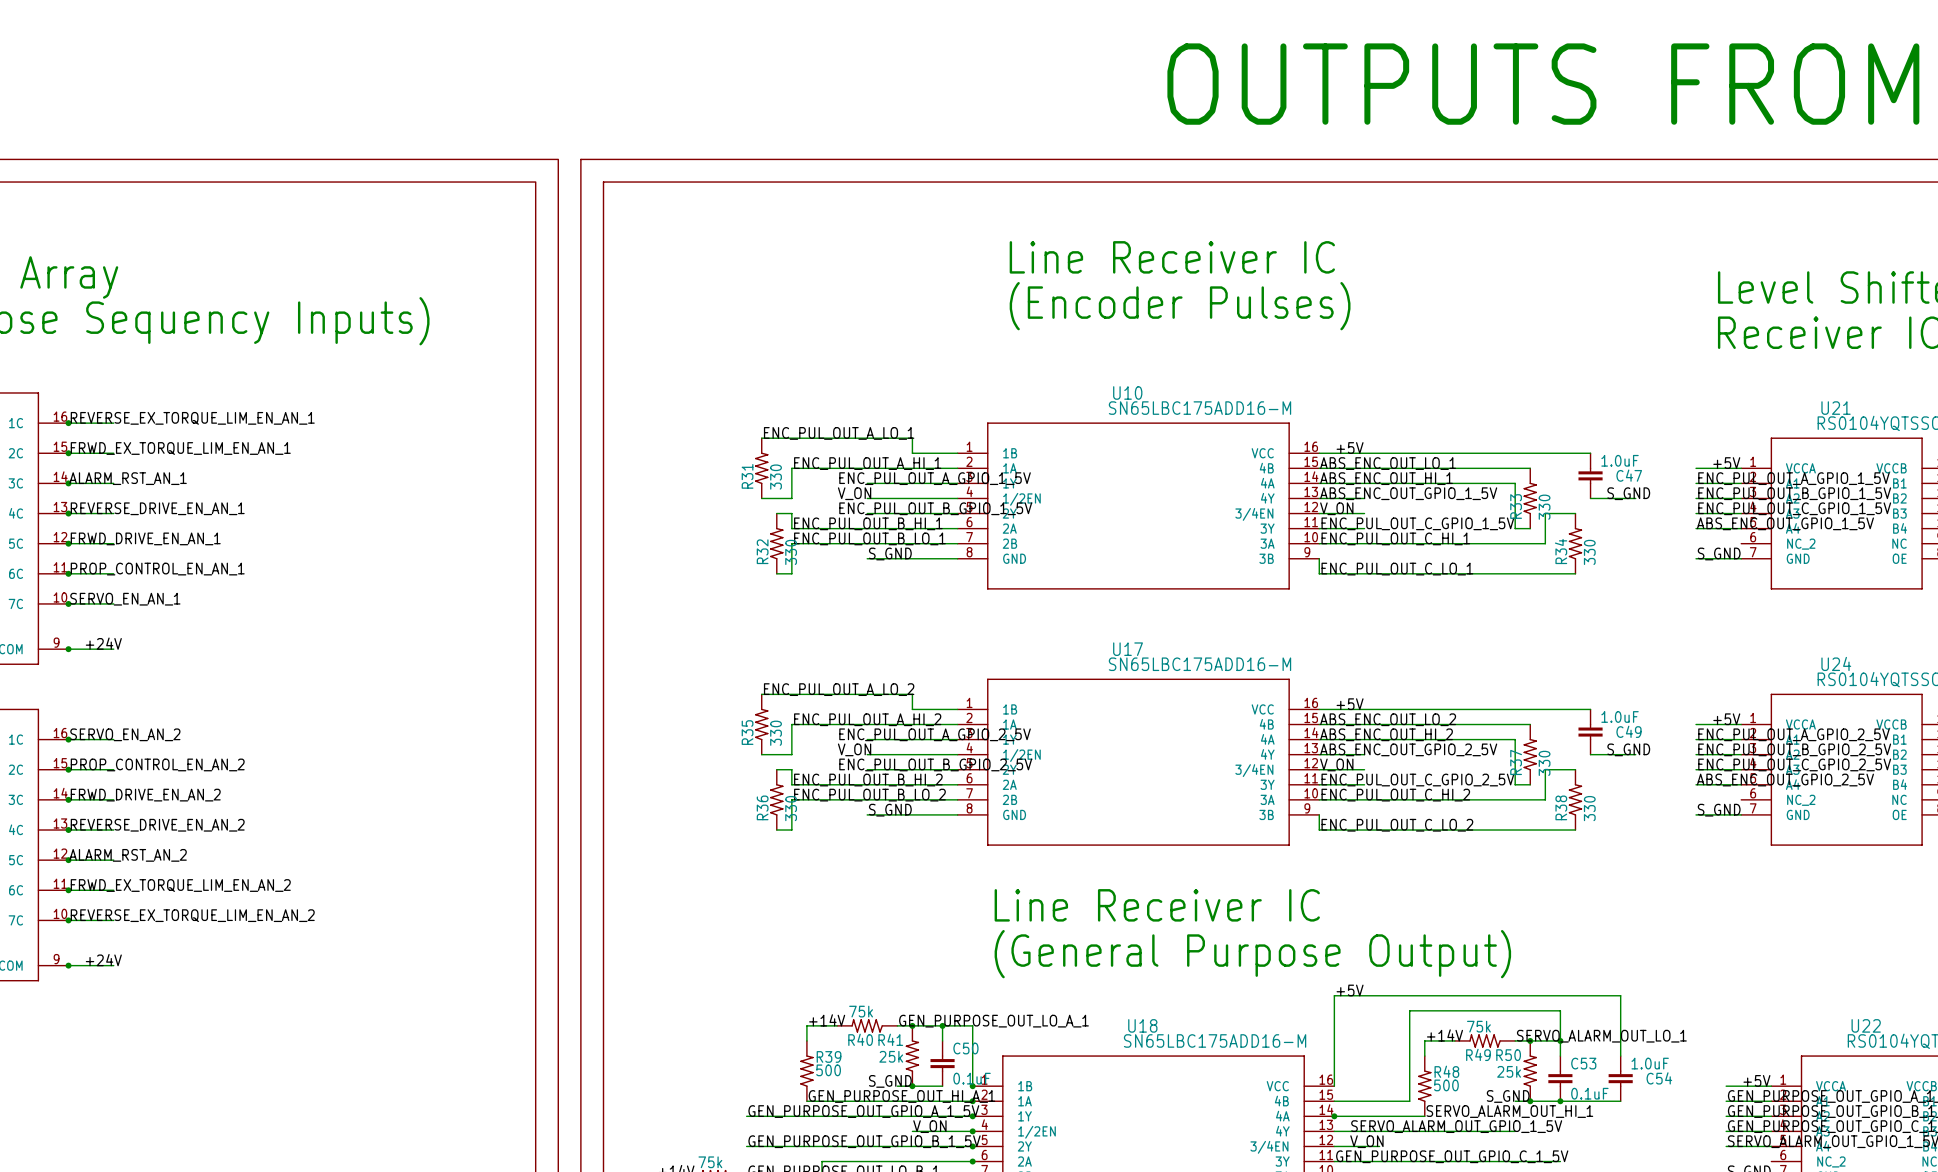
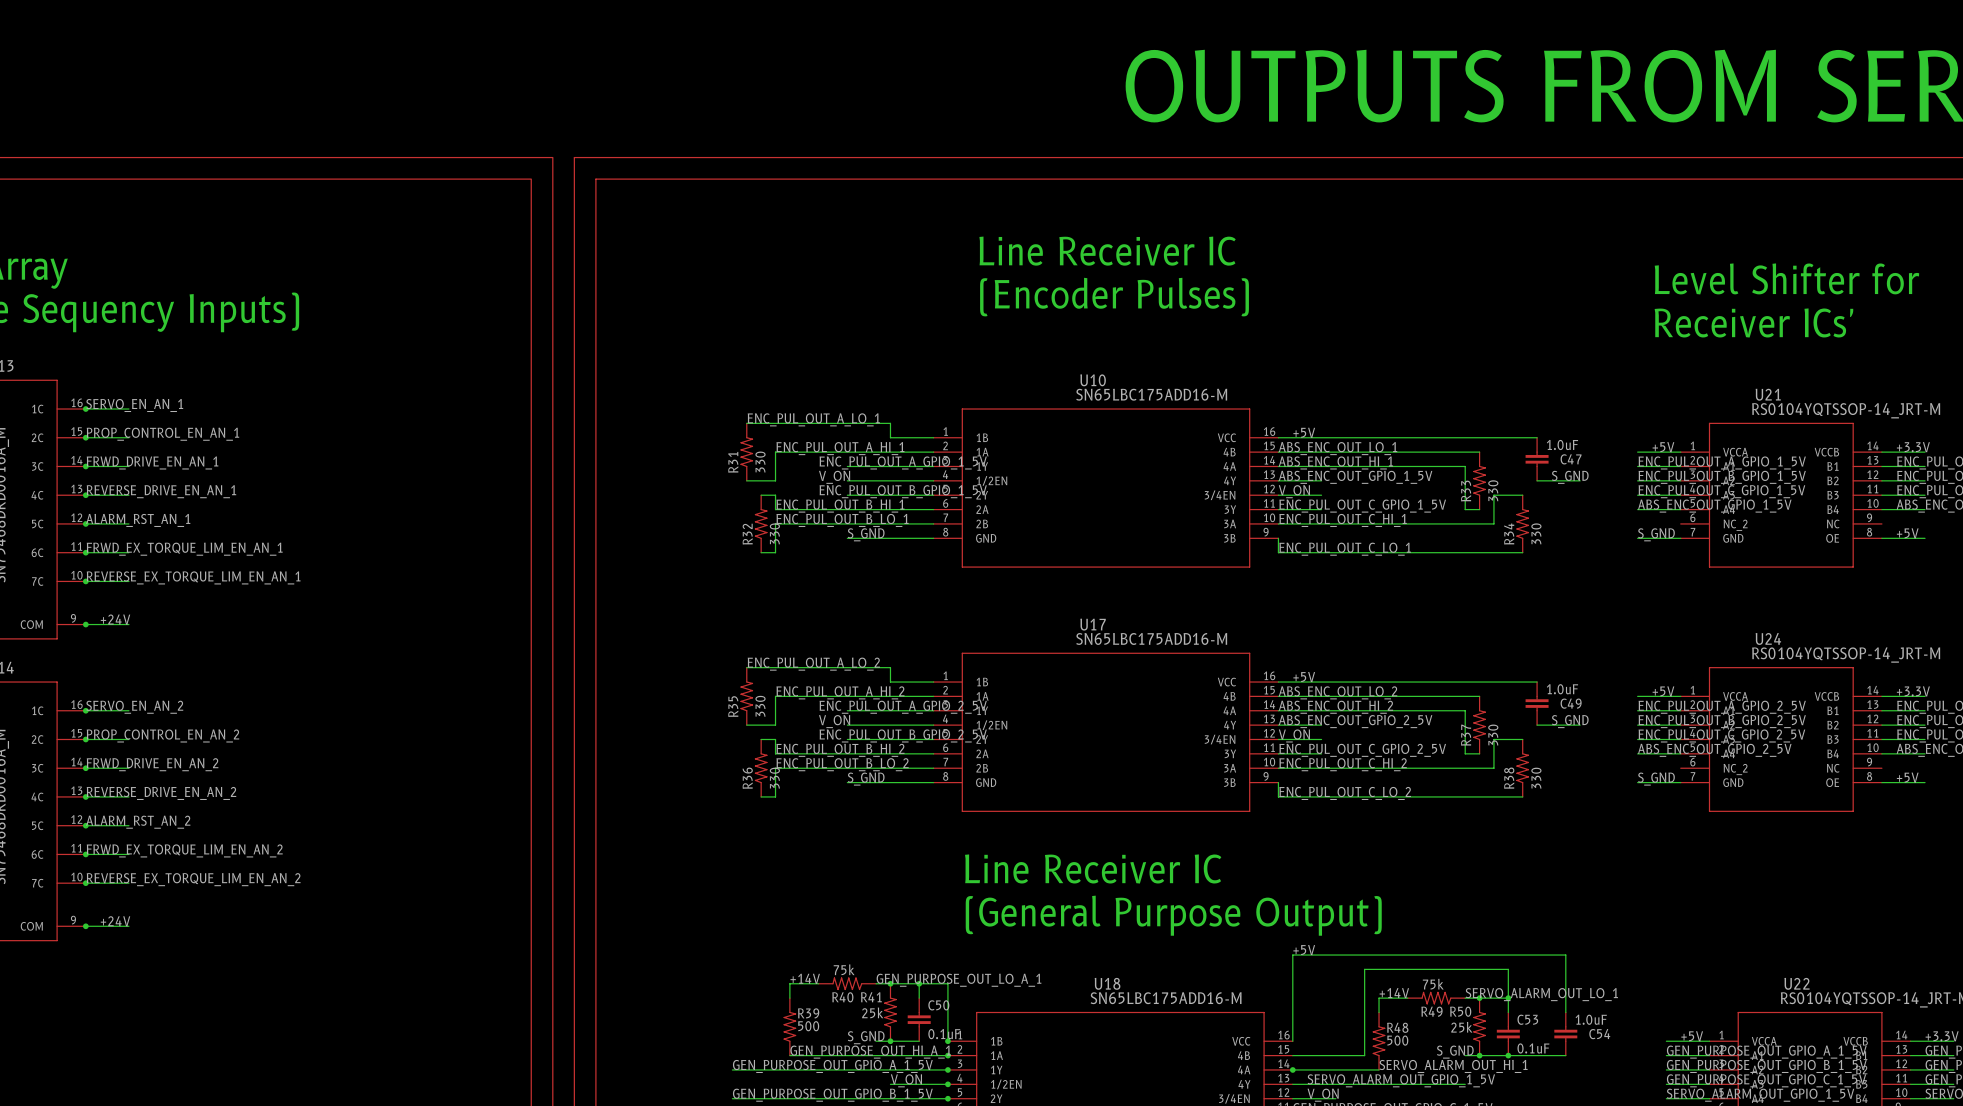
label: REVERSE_EX_TORQUE_LIM_EN_AN_1 (192, 418) -> SERVO_EN_AN_1 (134, 405)
label: FRWD_EX_TORQUE_LIM_EN_AN_1 (180, 448) -> PROP_CONTROL_EN_AN_1 (162, 434)
label: ALARM_RST_AN_1 (128, 478) -> FRWD_DRIVE_EN_AN_1 (152, 462)
label: FRWD_DRIVE_EN_AN_1 (145, 538) -> ALARM_RST_AN_1 (138, 520)
label: PROP_CONTROL_EN_AN_1 (157, 569) -> FRWD_EX_TORQUE_LIM_EN_AN_1 (184, 549)
label: SERVO_EN_AN_1 (125, 599) -> REVERSE_EX_TORQUE_LIM_EN_AN_1 (193, 577)

